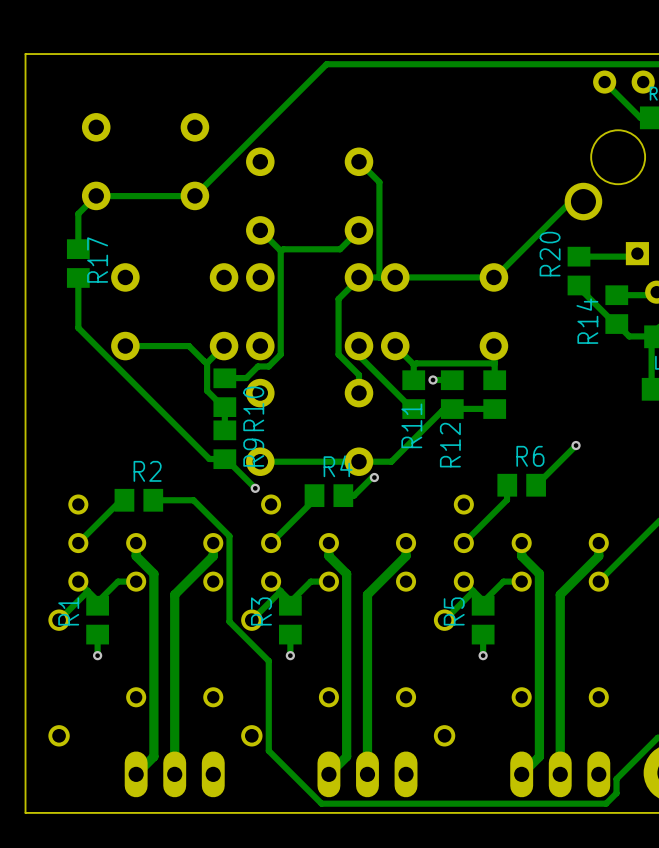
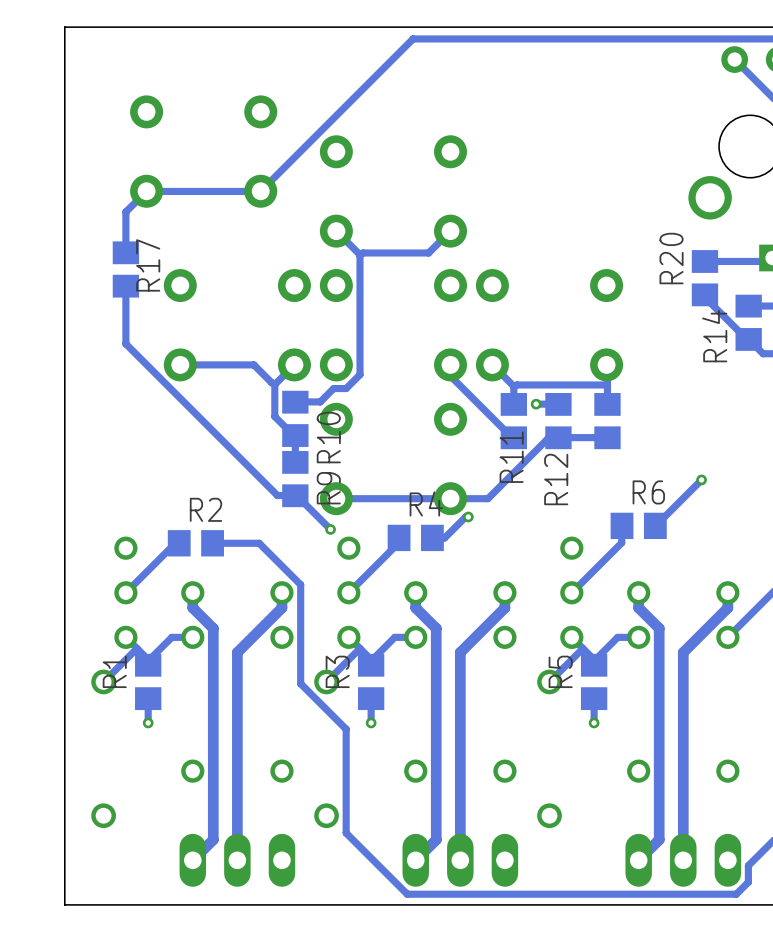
track: (359, 161) (379, 182) (379, 277) -> none
track: (583, 201) (570, 201) (493, 277) (359, 277) (338, 299) (338, 354) (359, 374) (359, 393) -> none

